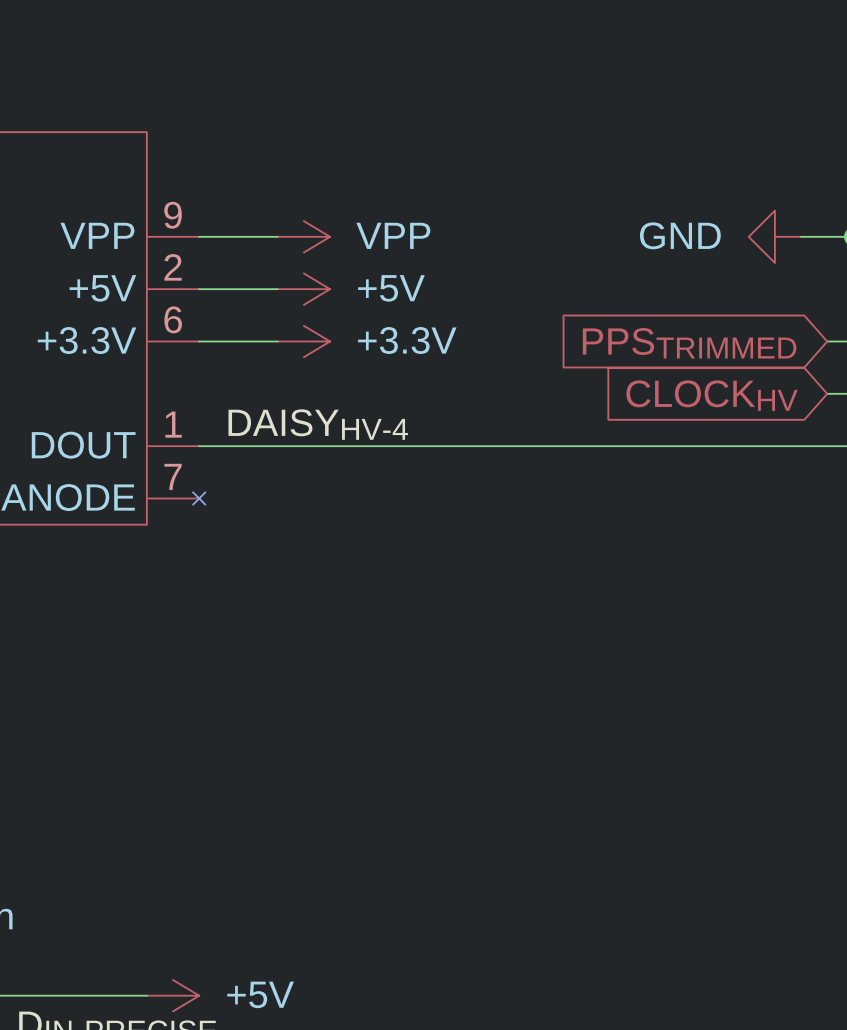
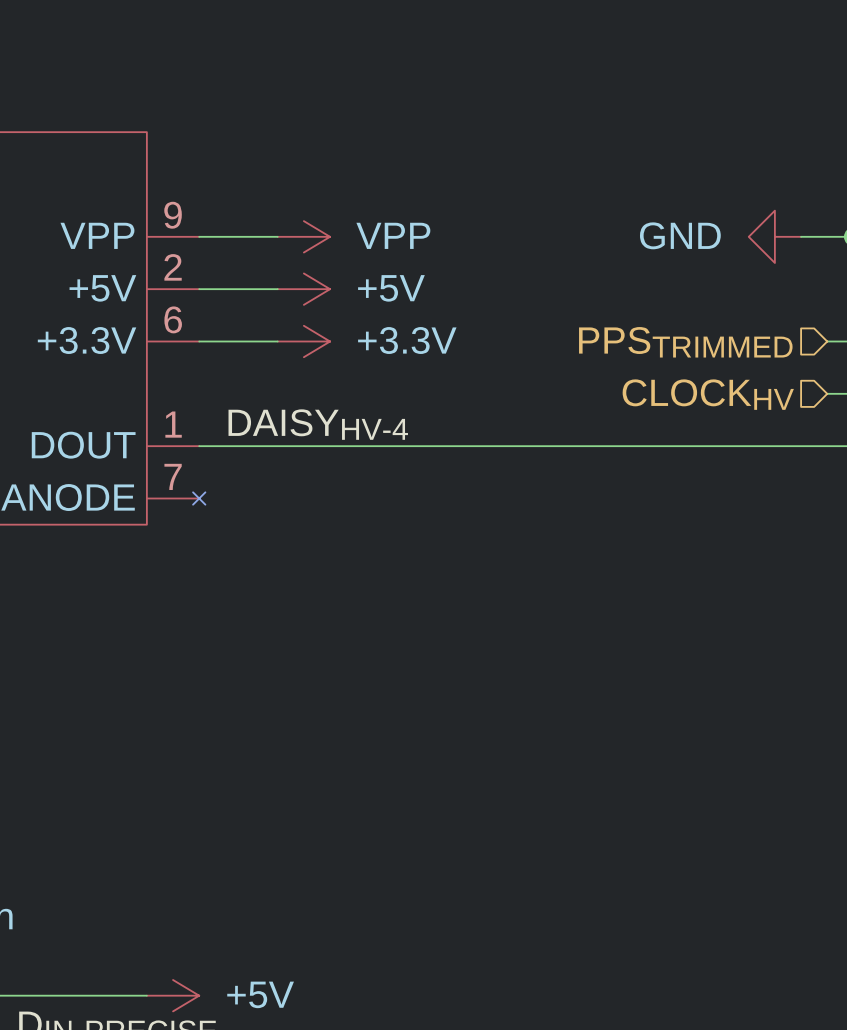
hierarchical label: none -> PPSTRIMMED (685, 342)
global label: PPSTRIMMED (689, 343) -> none
hierarchical label: none -> CLOCKHV (708, 394)
global label: CLOCKHV (712, 395) -> none

